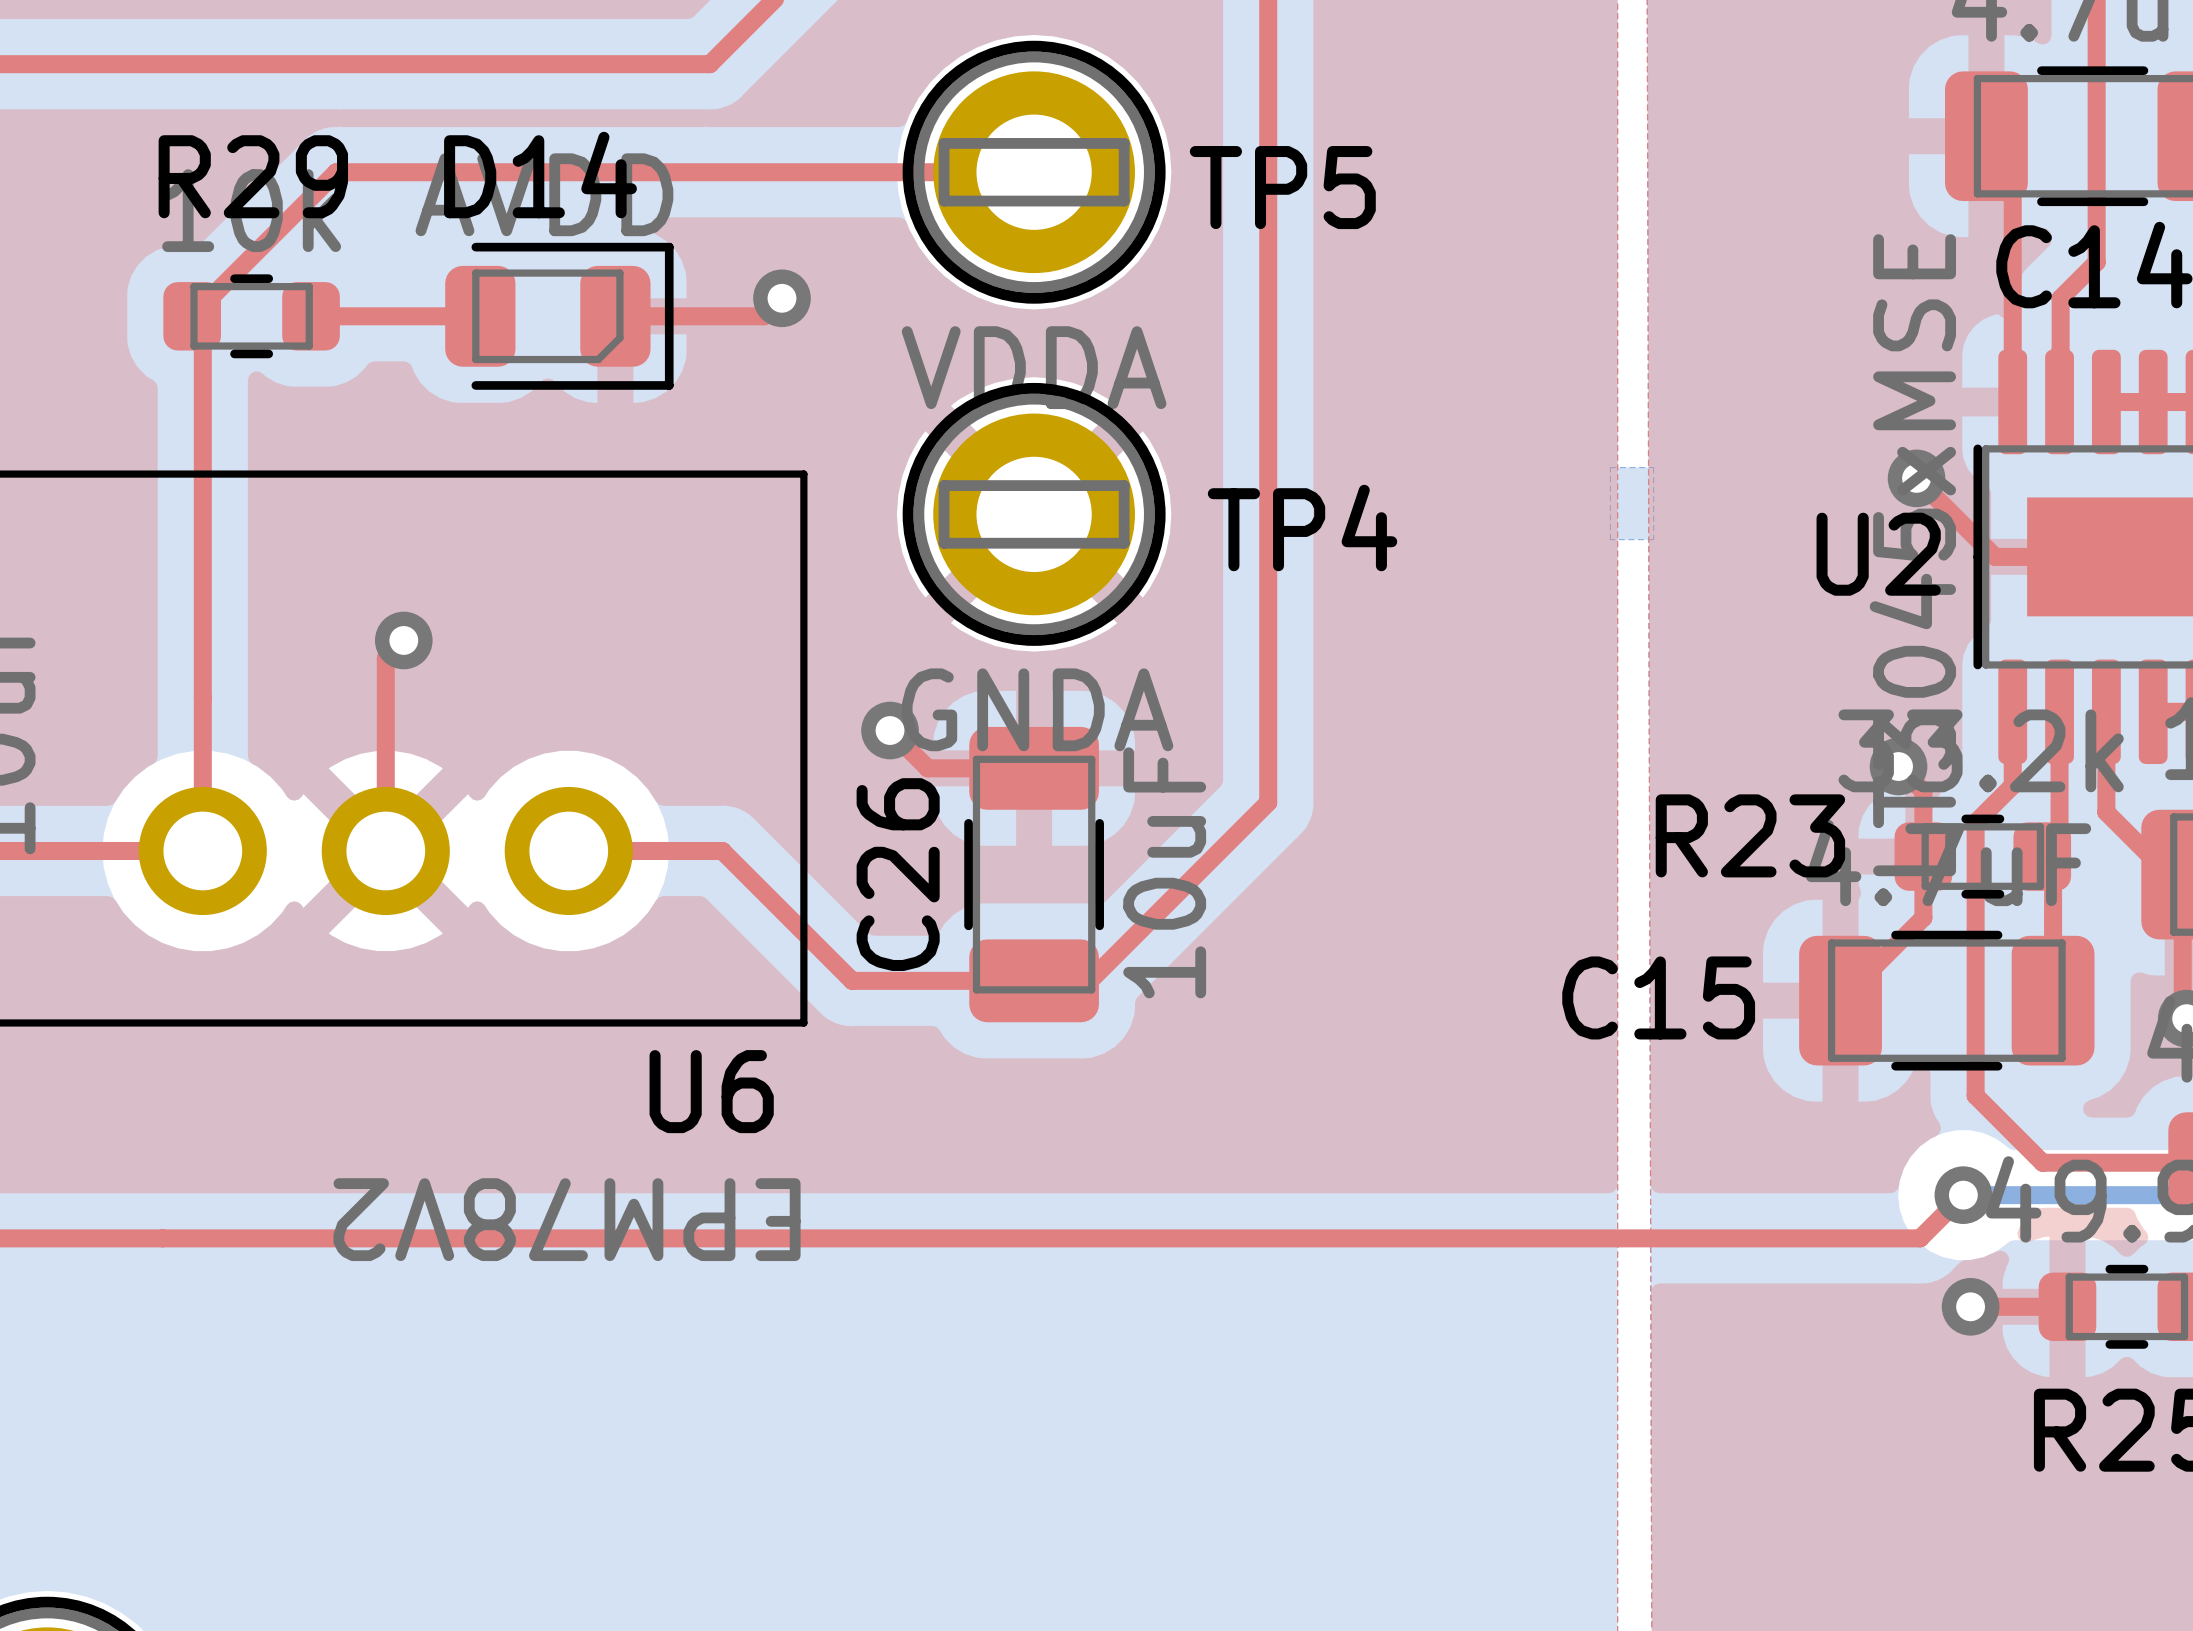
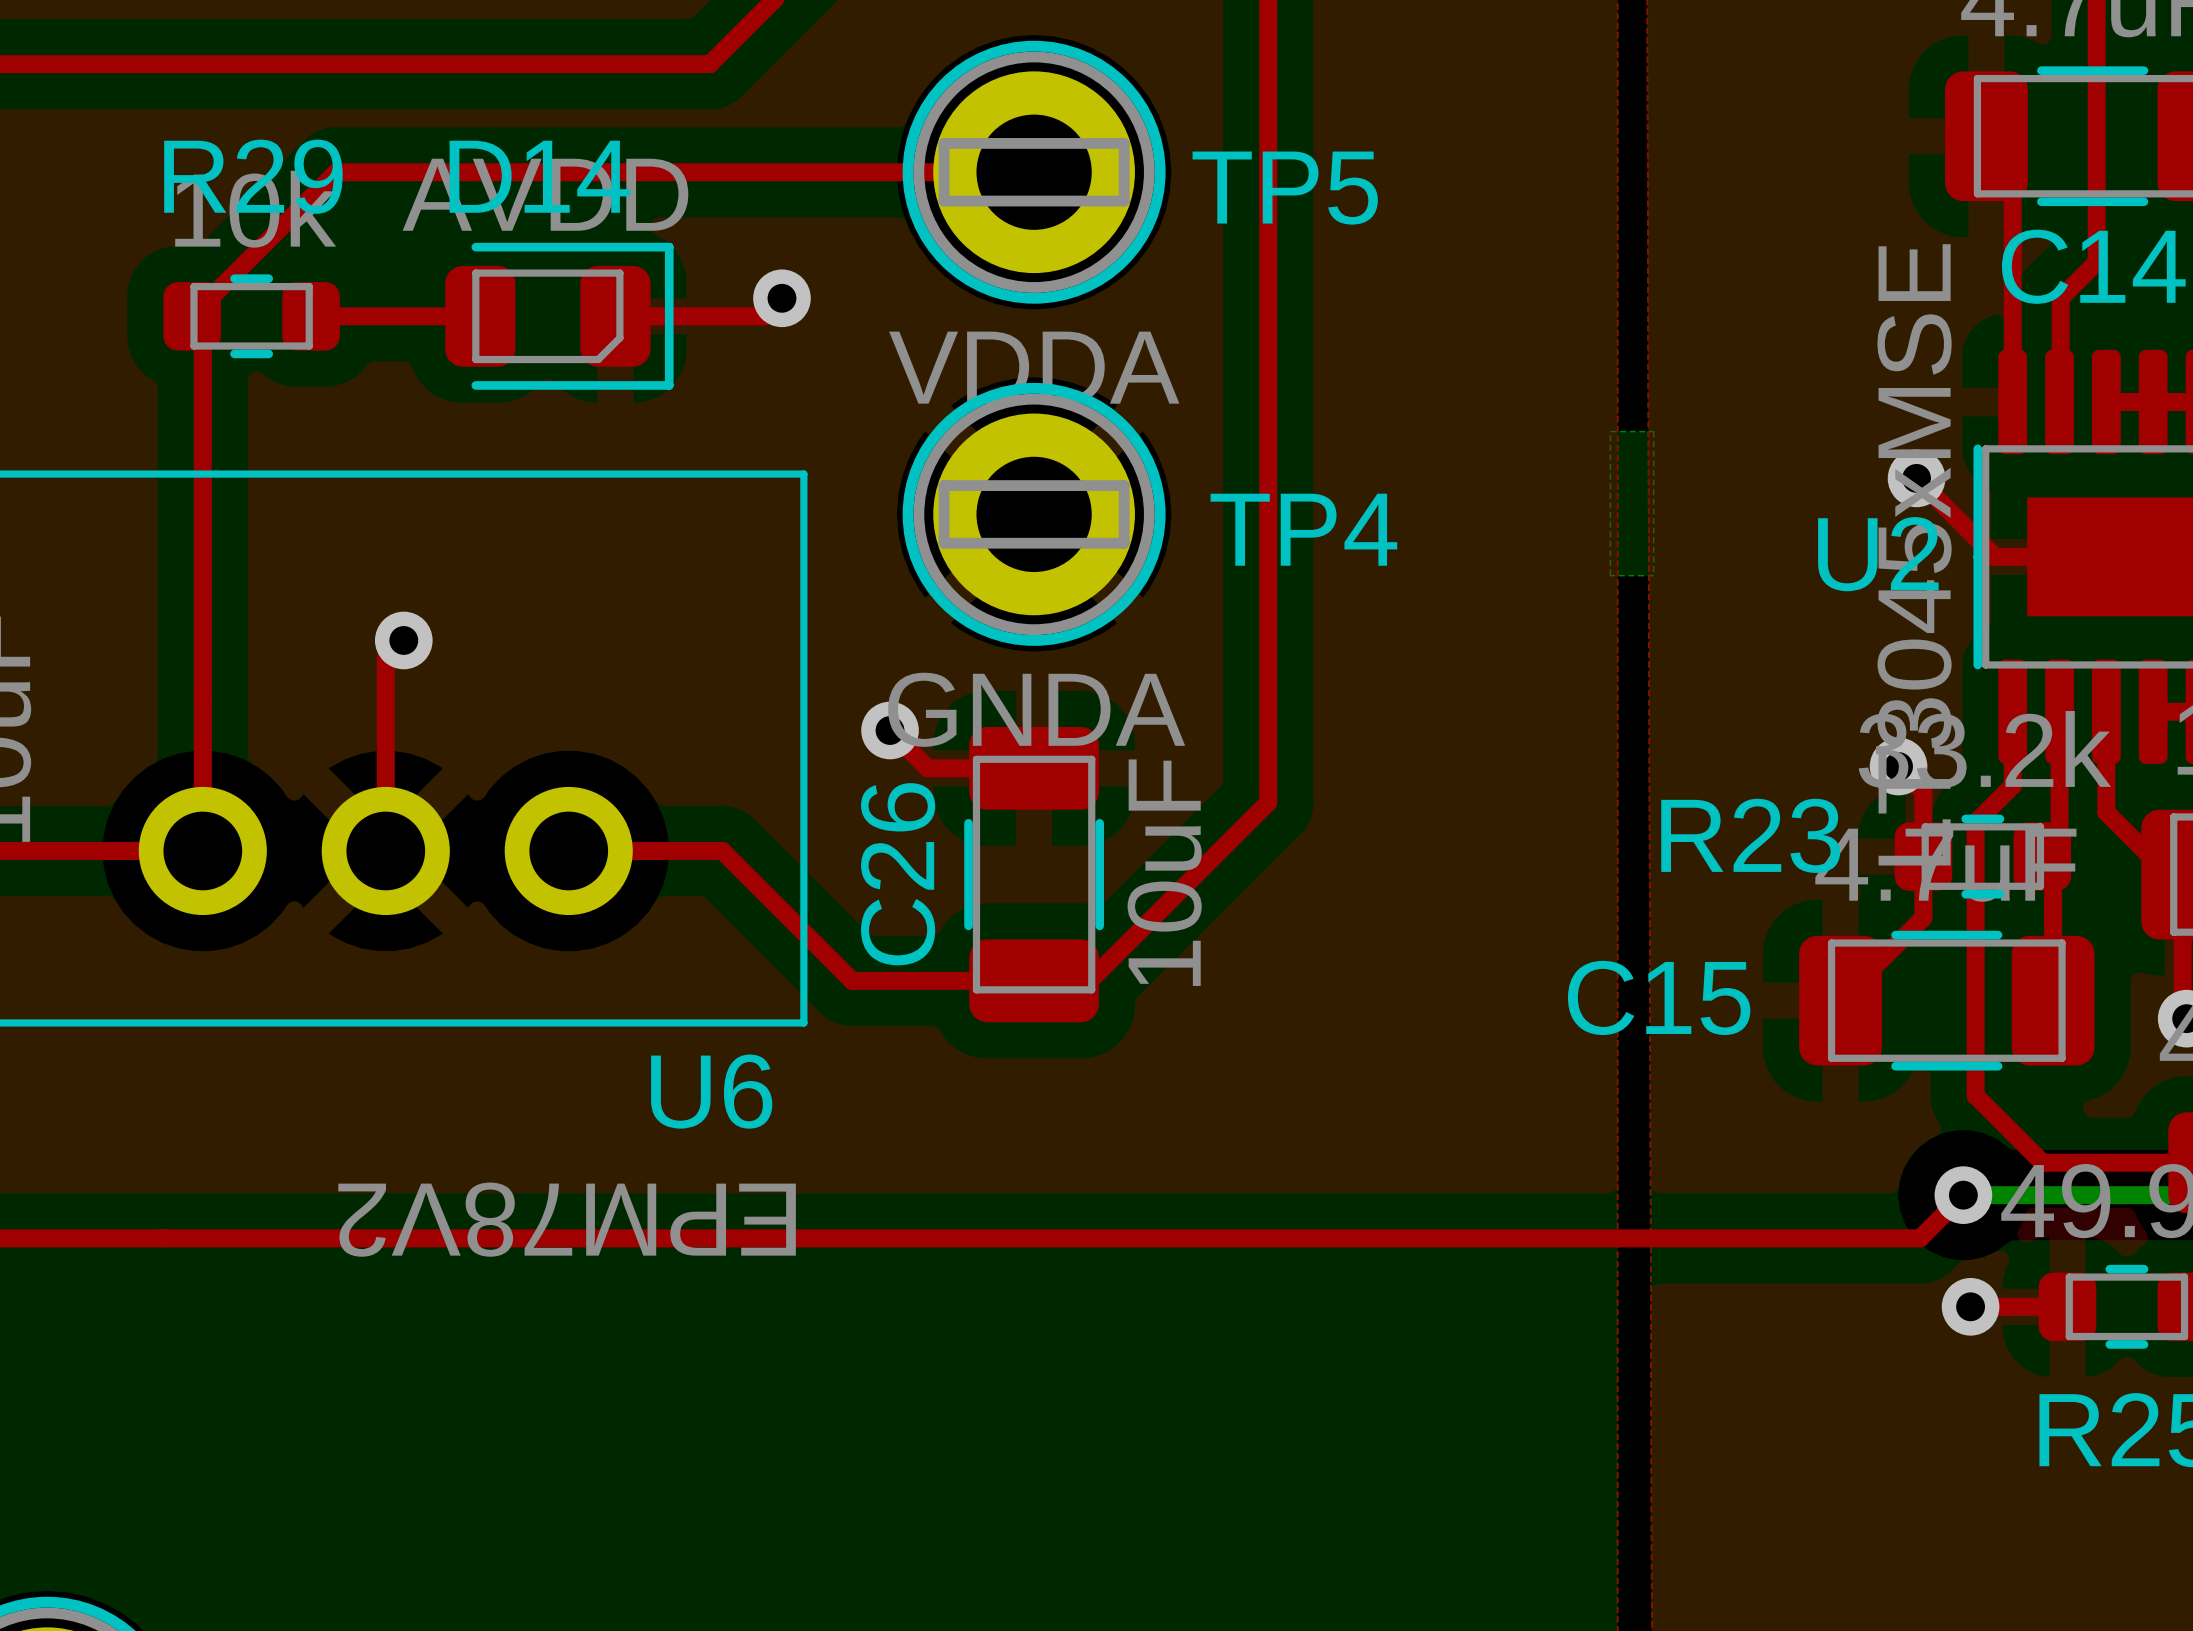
bottom zone outline: (1610, 467) (1653, 467) -> (1610, 467) (1610, 431) (1653, 431) (1653, 467)
bottom zone outline: (1610, 539) (1653, 539) -> (1610, 539) (1610, 575) (1653, 575) (1653, 539)

